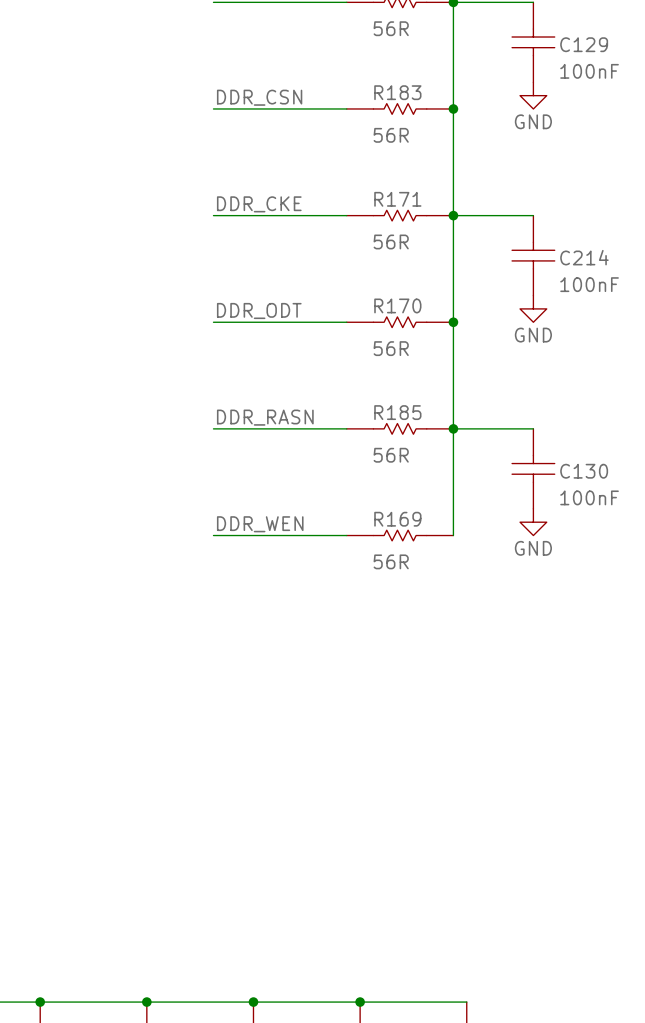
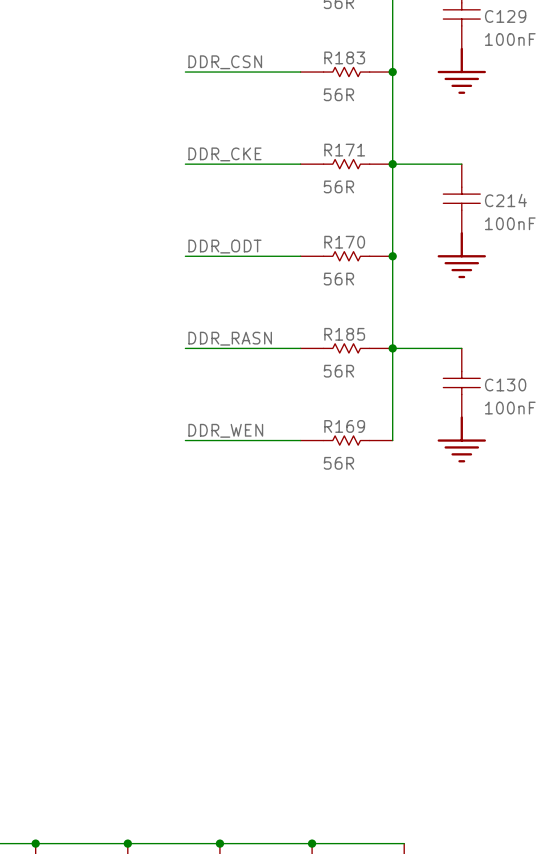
power symbol: GND (533, 95) -> none
power symbol: none -> (461, 70)
power symbol: GND (533, 308) -> none
power symbol: none -> (461, 255)
power symbol: GND (533, 522) -> none
power symbol: none -> (461, 439)

